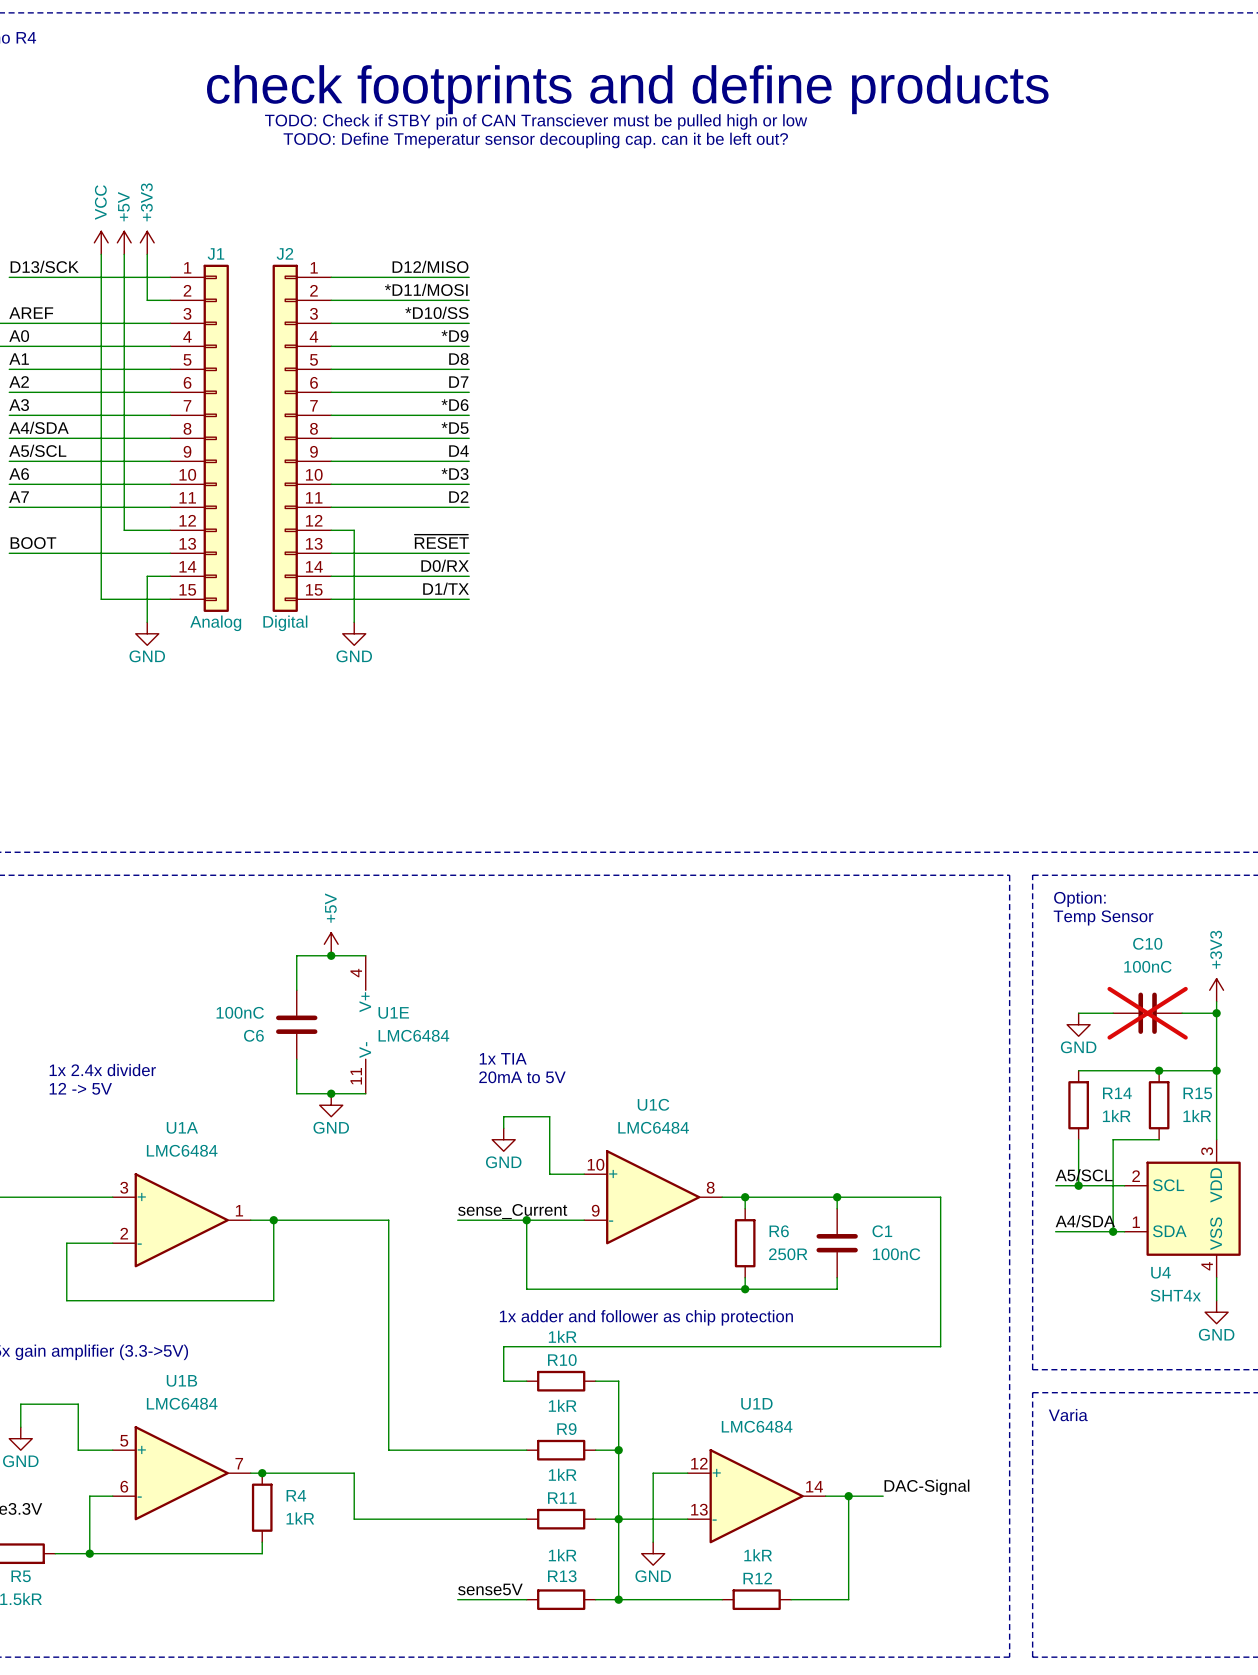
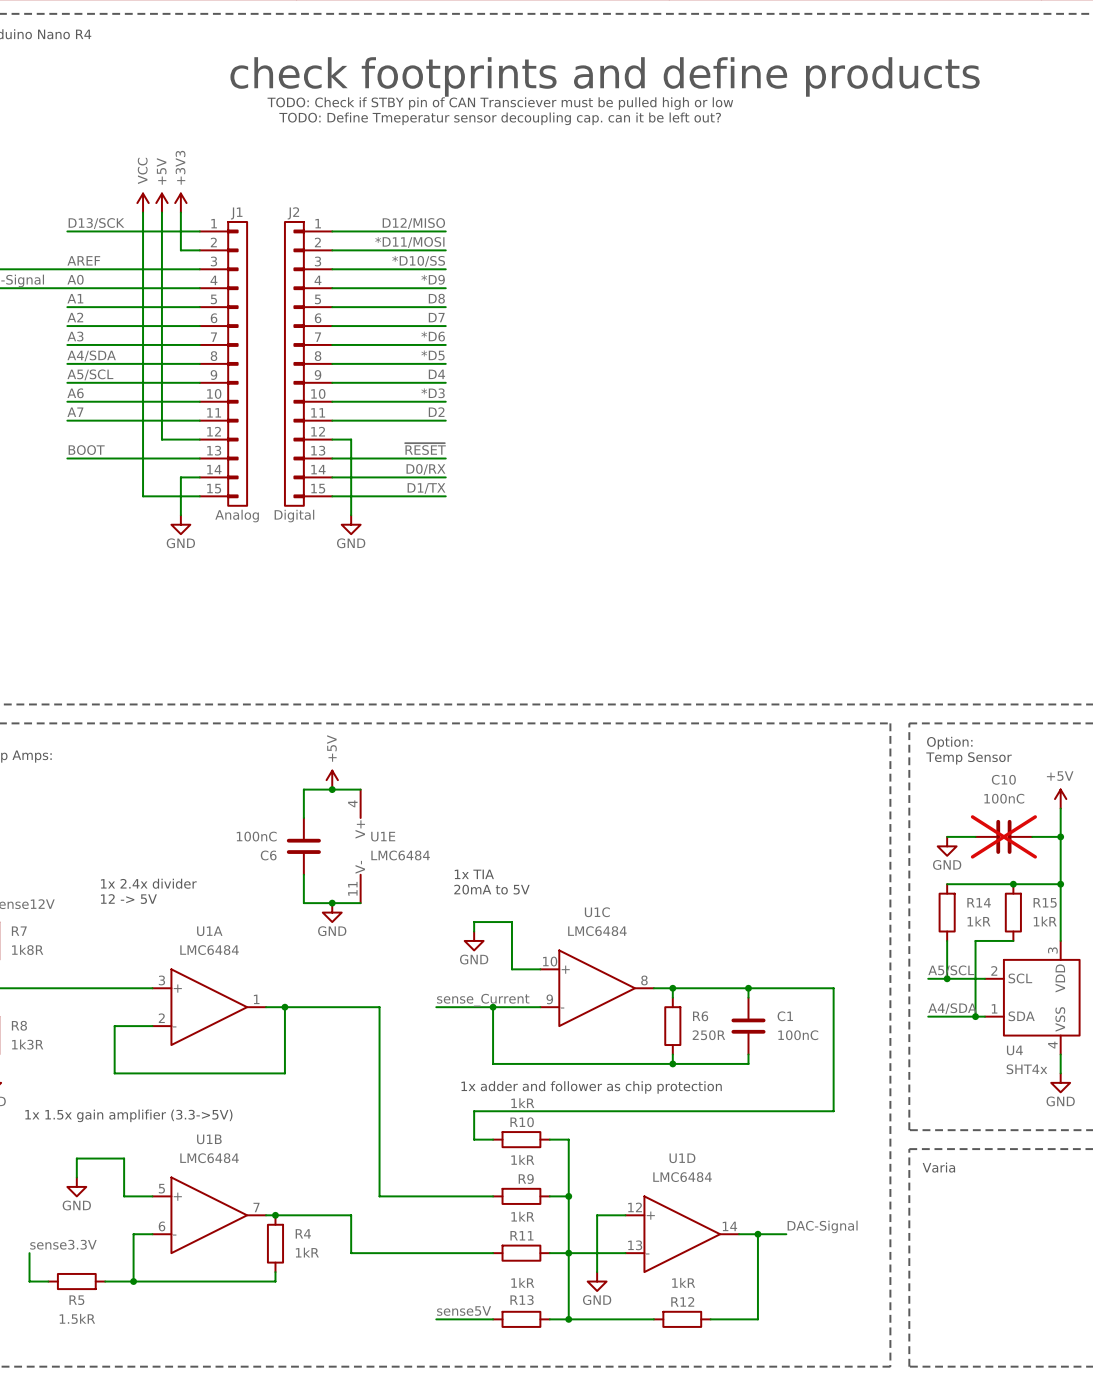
power symbol: none -> +5V (1060, 799)
power symbol: +3V3 (1216, 990) -> none

